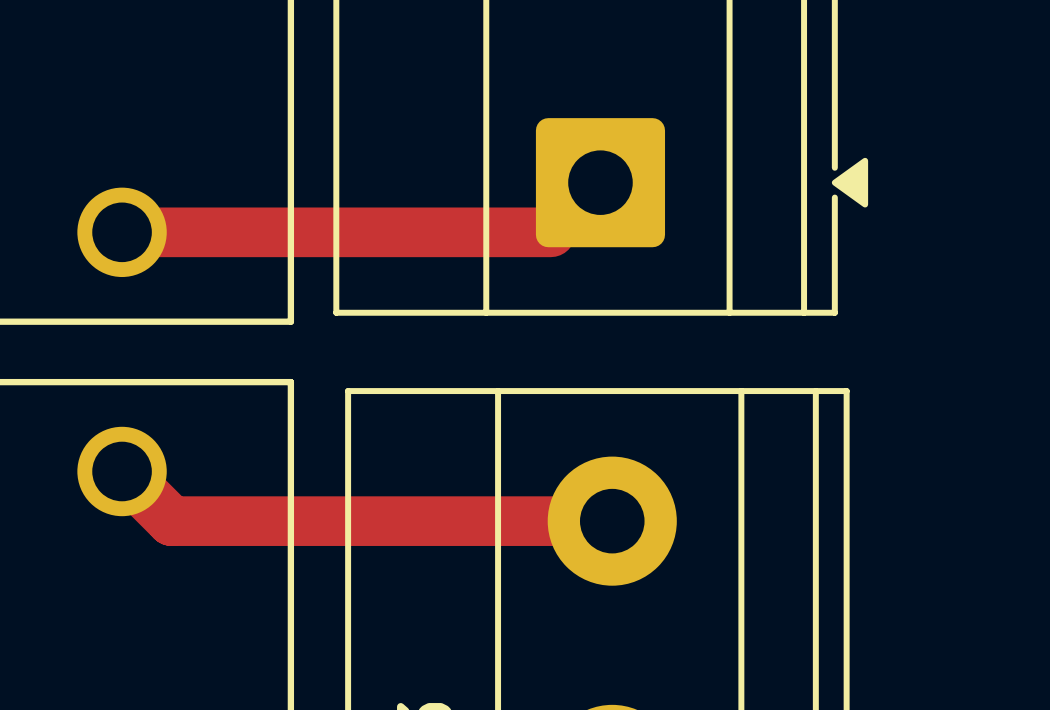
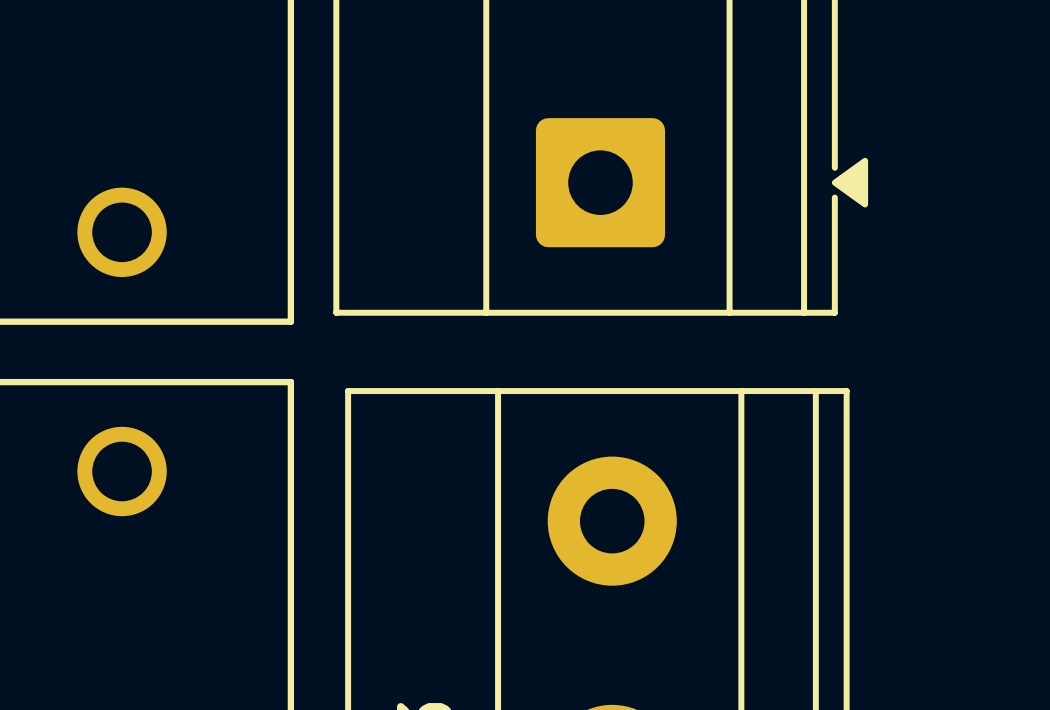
top track: (600, 182) (550, 232) (122, 232) -> none
top track: (122, 471) (171, 521) (612, 521) -> none

